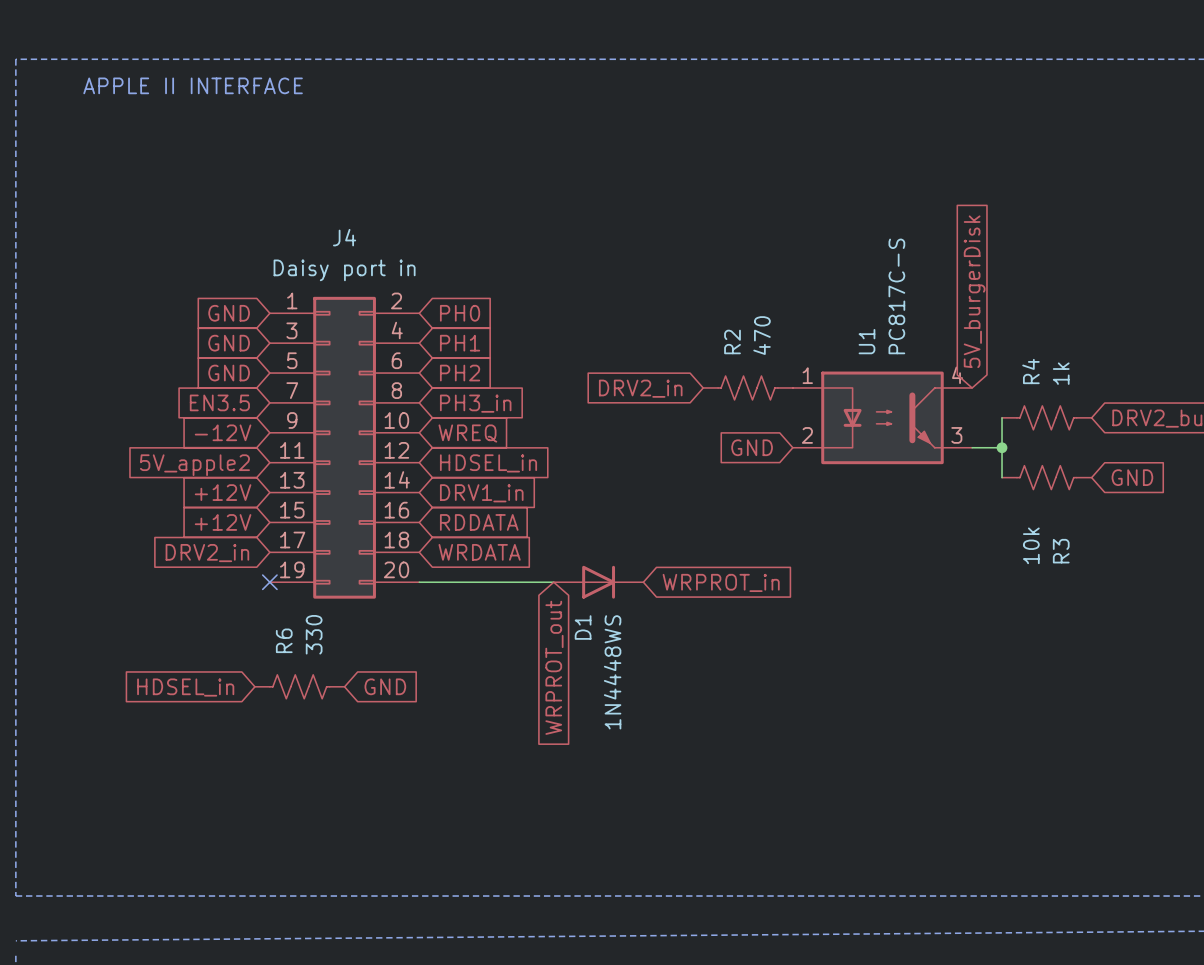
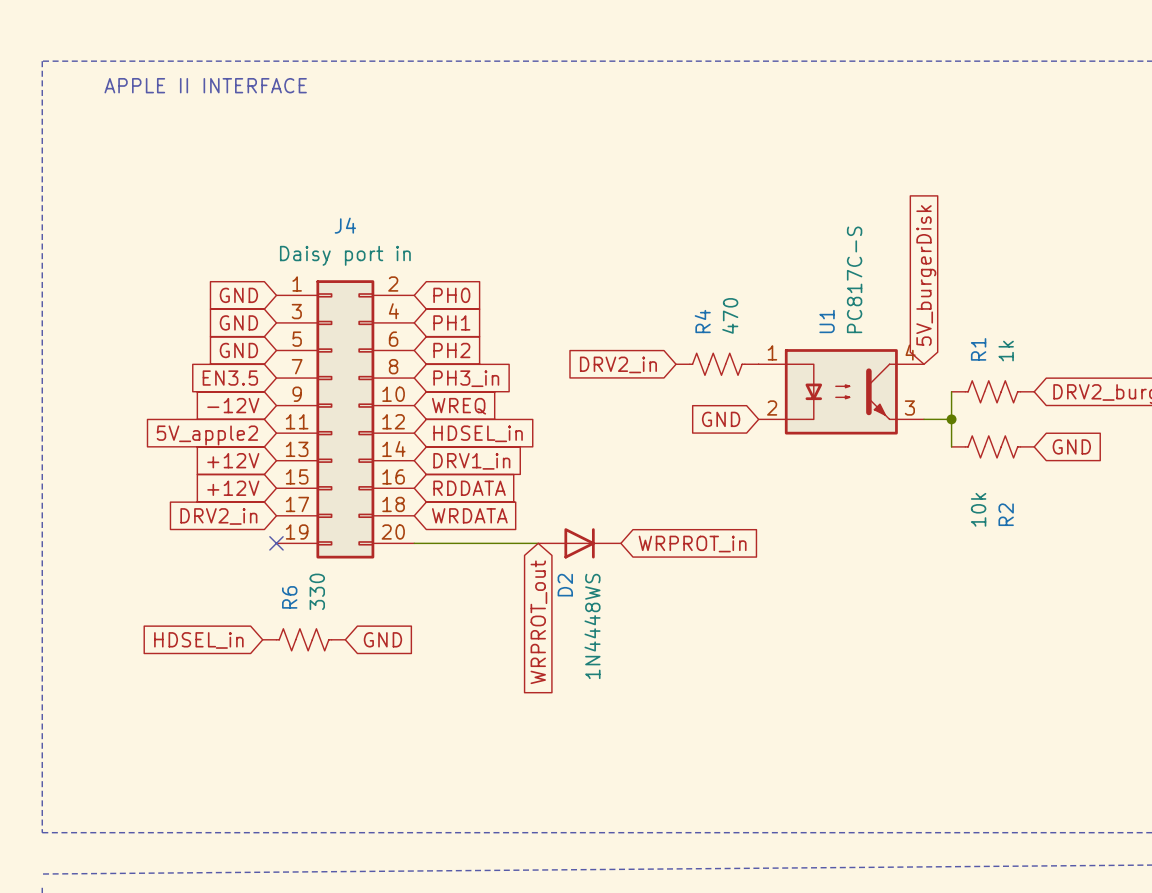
R2 name: R2 (732, 341) -> R4 (702, 321)
R4 name: R4 (1030, 371) -> R1 (978, 349)
R3 name: R3 (1061, 551) -> R2 (1006, 514)
D1 name: D1 (583, 627) -> D2 (565, 585)

